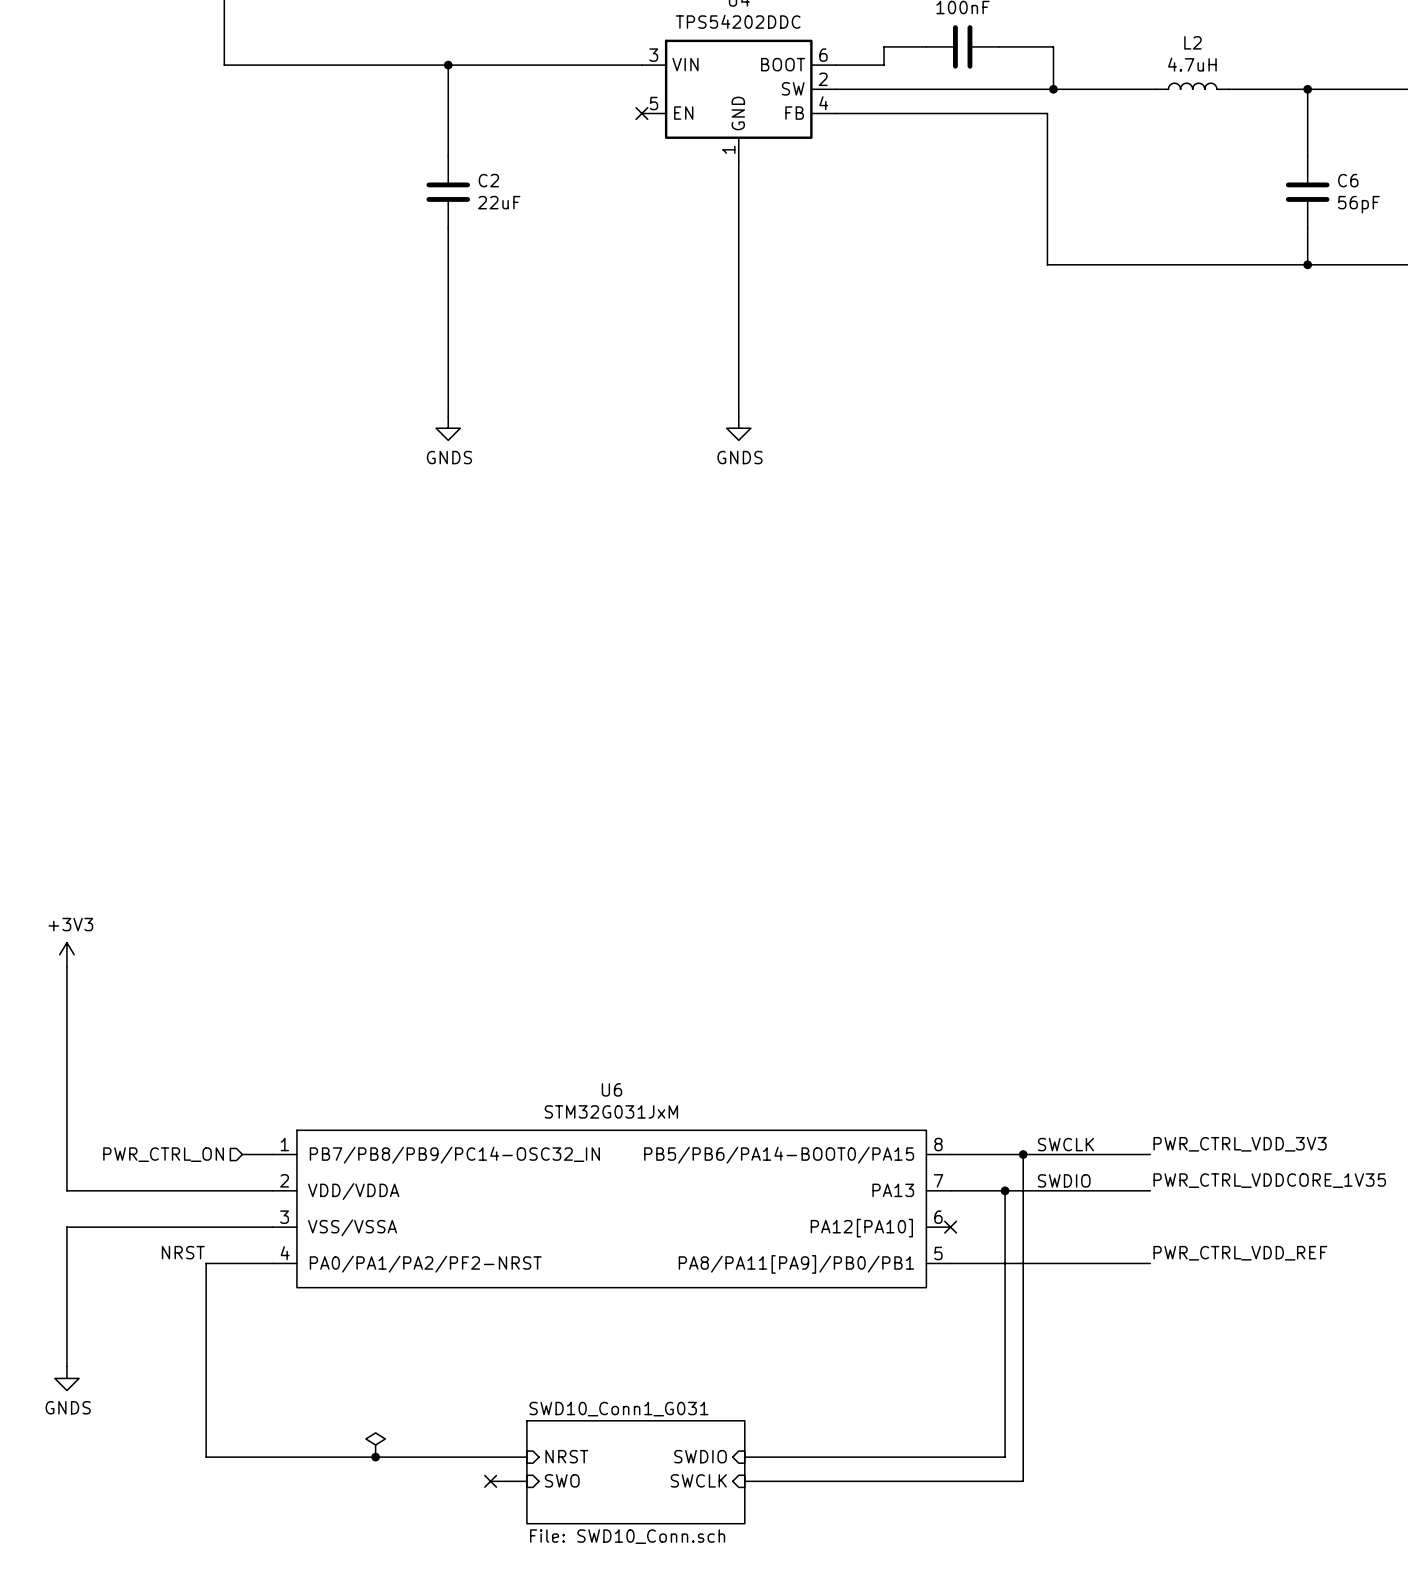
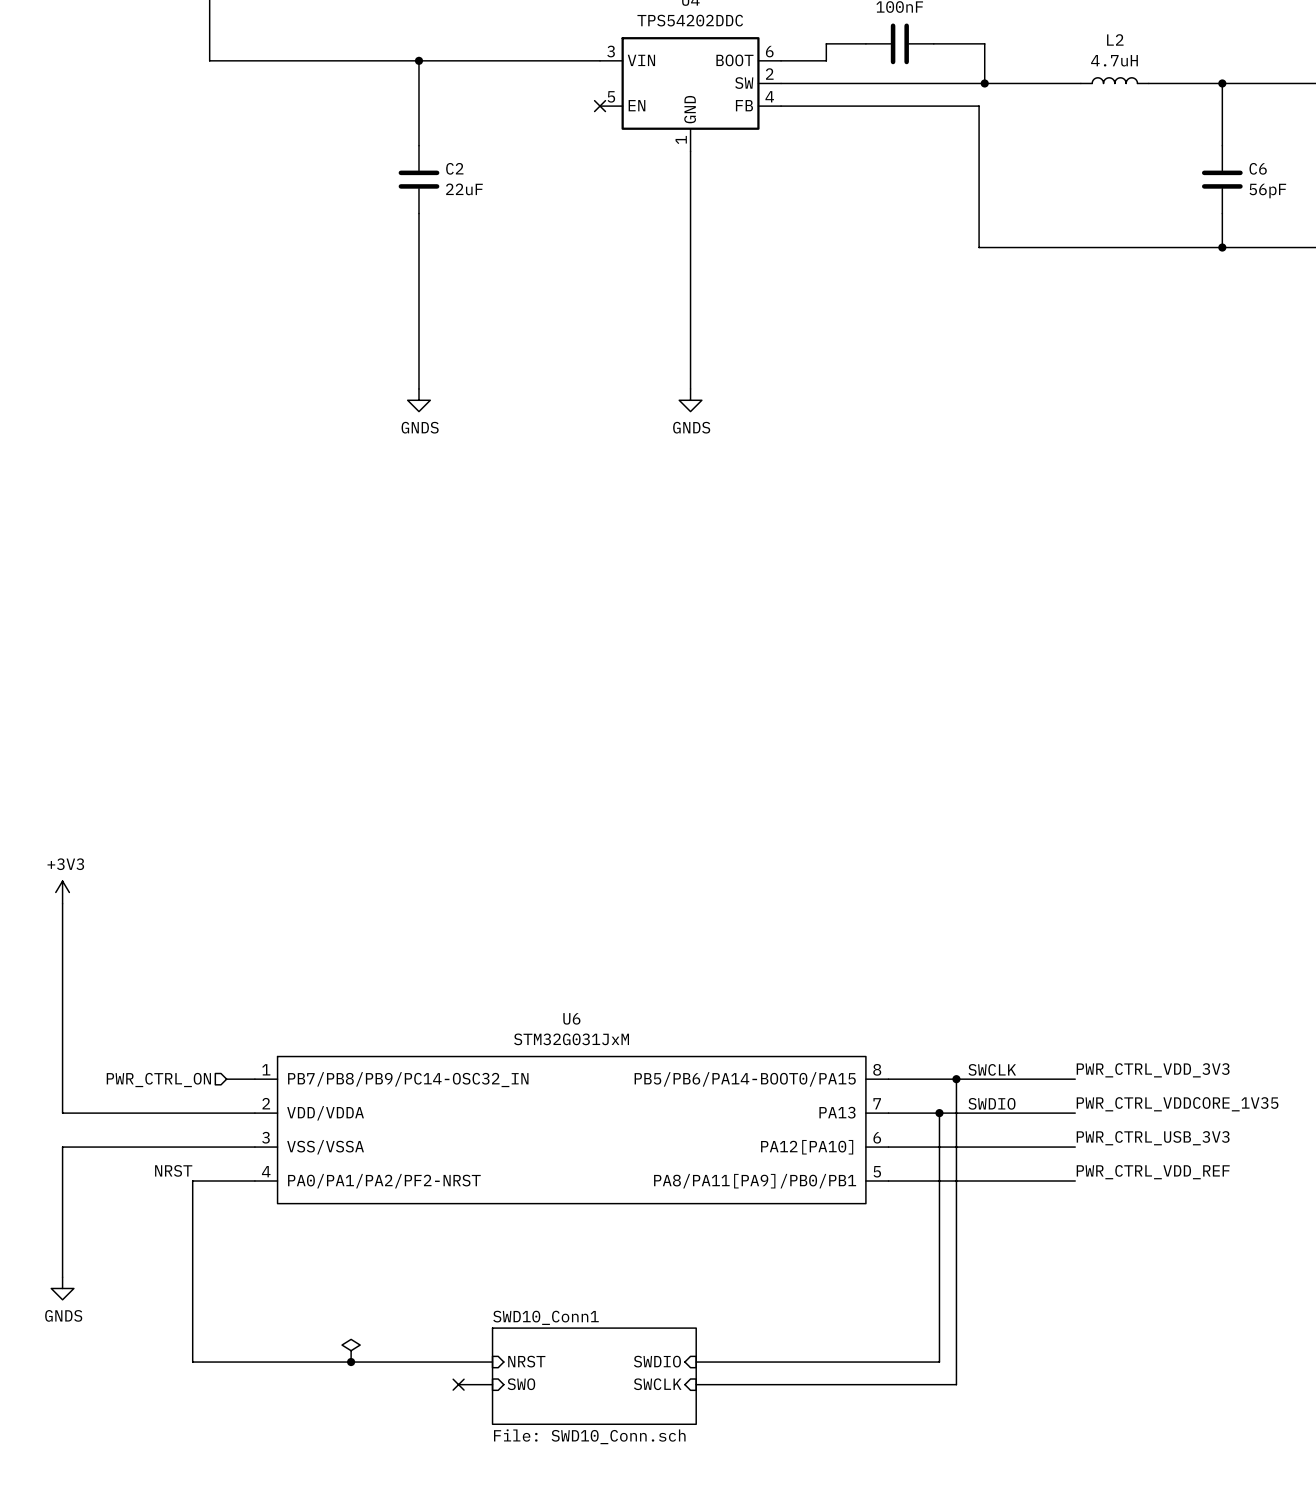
label: none -> PWR_CTRL_USB_3V3 (1153, 1138)
wire: none -> (888, 1147) (1075, 1147)
no-connect mark: (950, 1227) -> none
sheet SWD10_Conn1_G031 name: SWD10_Conn1_G031 (618, 1409) -> SWD10_Conn1 (546, 1317)

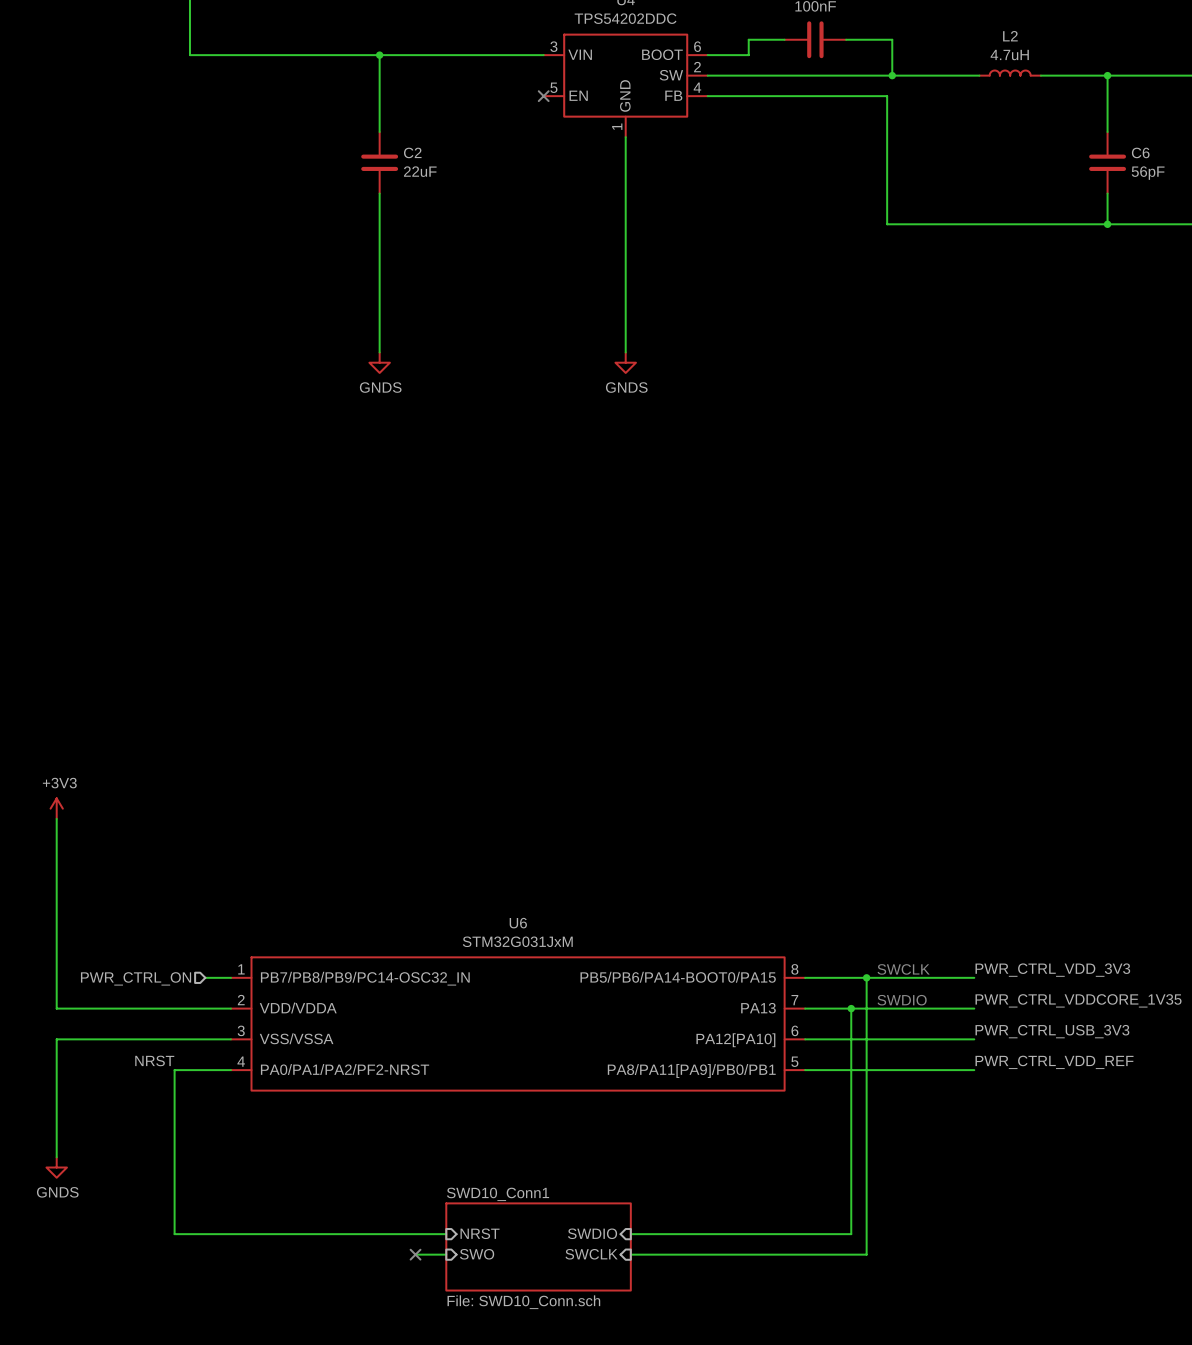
power symbol: (351, 1350) -> none
junction: (351, 1362) -> none

